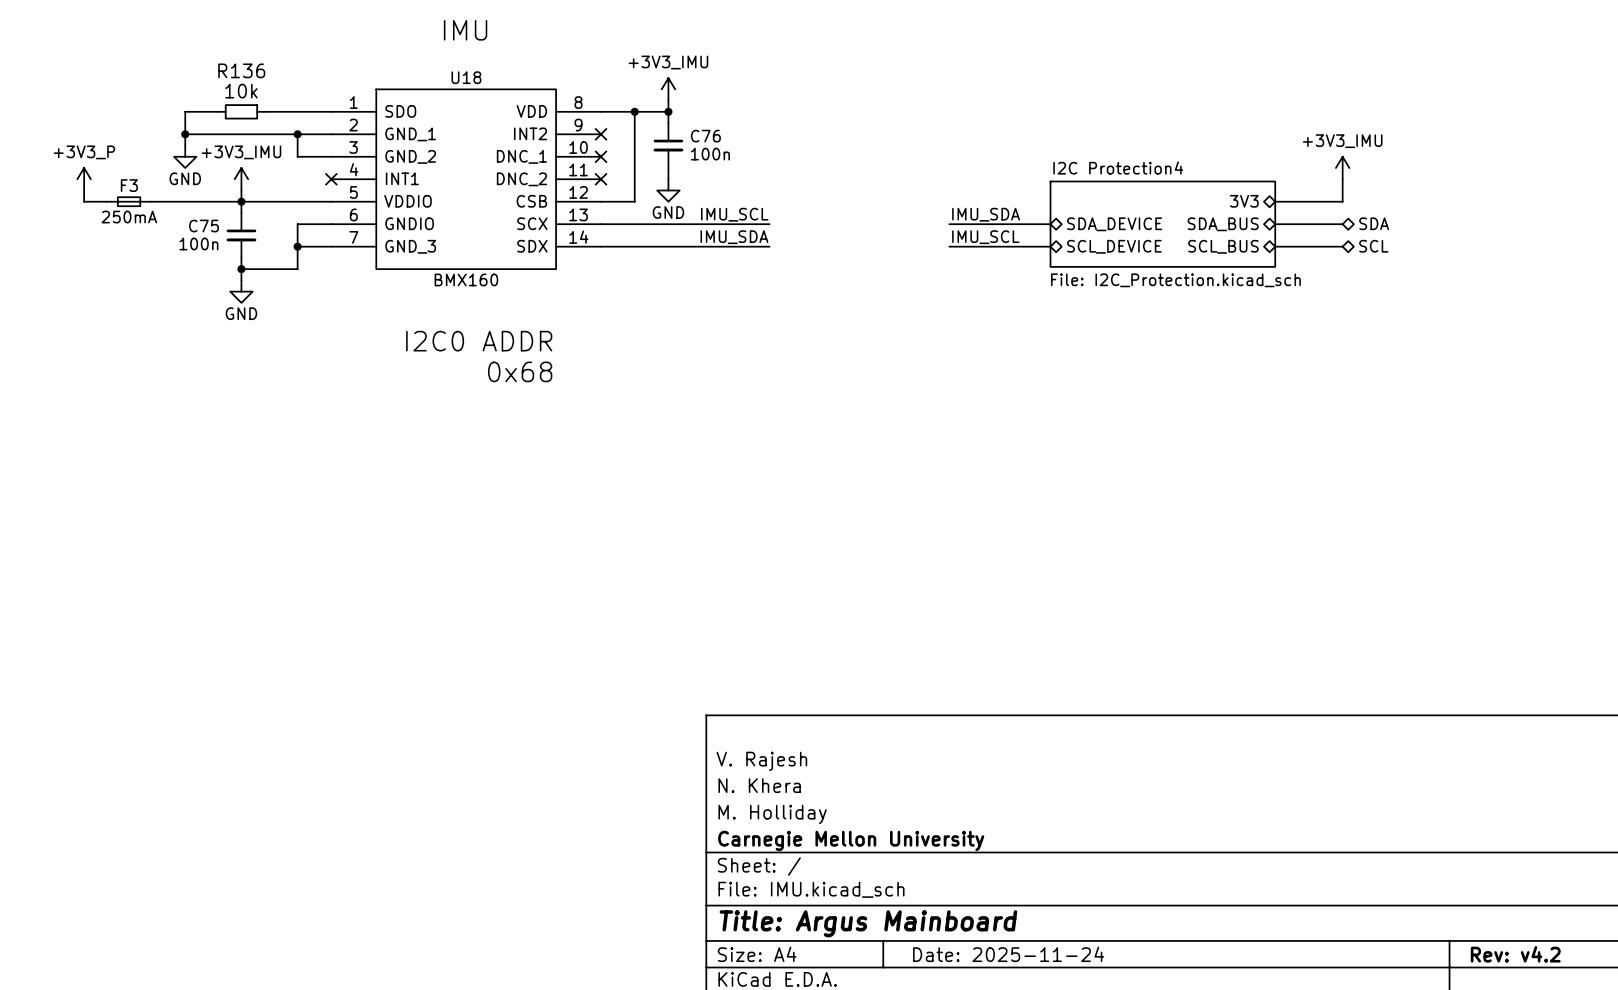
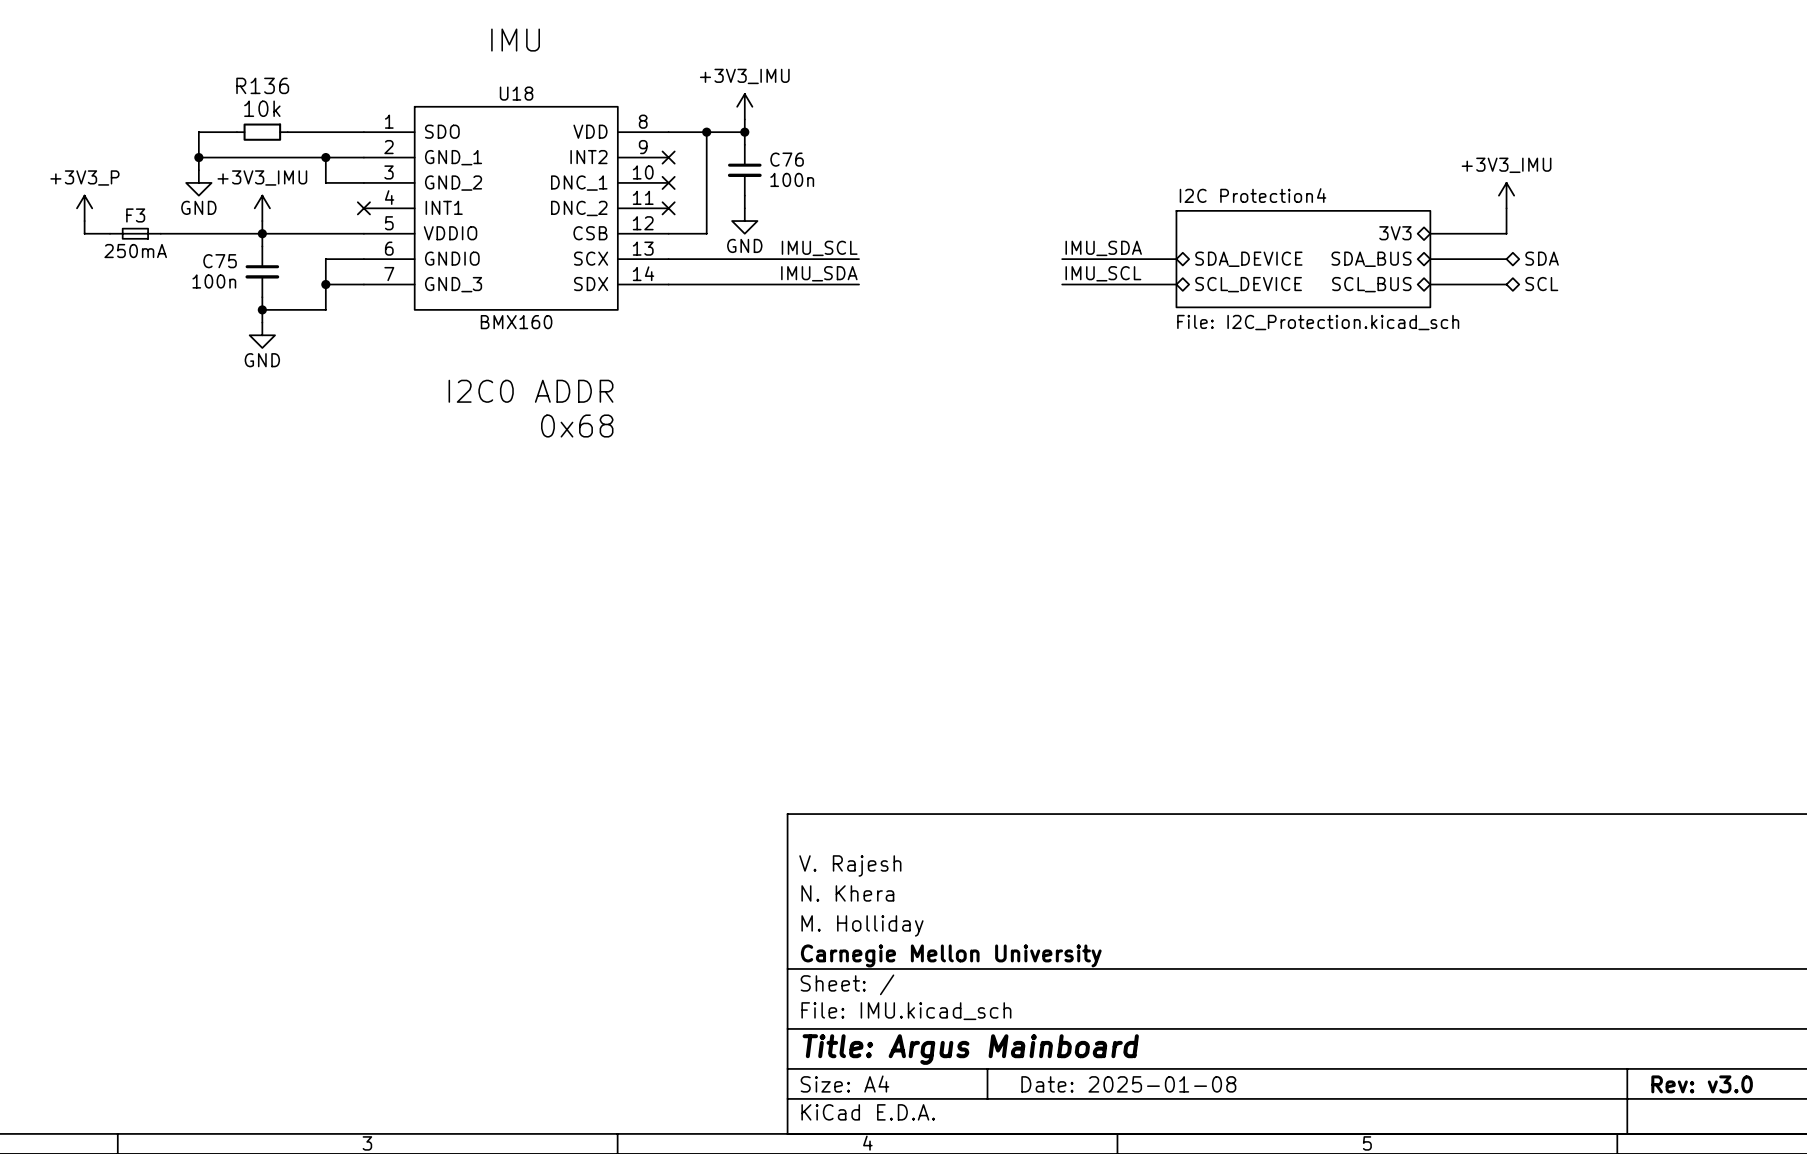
title block: Date: 2025-11-24 (1008, 954) -> Date: 2025-01-08 (1128, 1084)
title block: Rev: v4.2 (1515, 954) -> Rev: v3.0 (1702, 1084)

